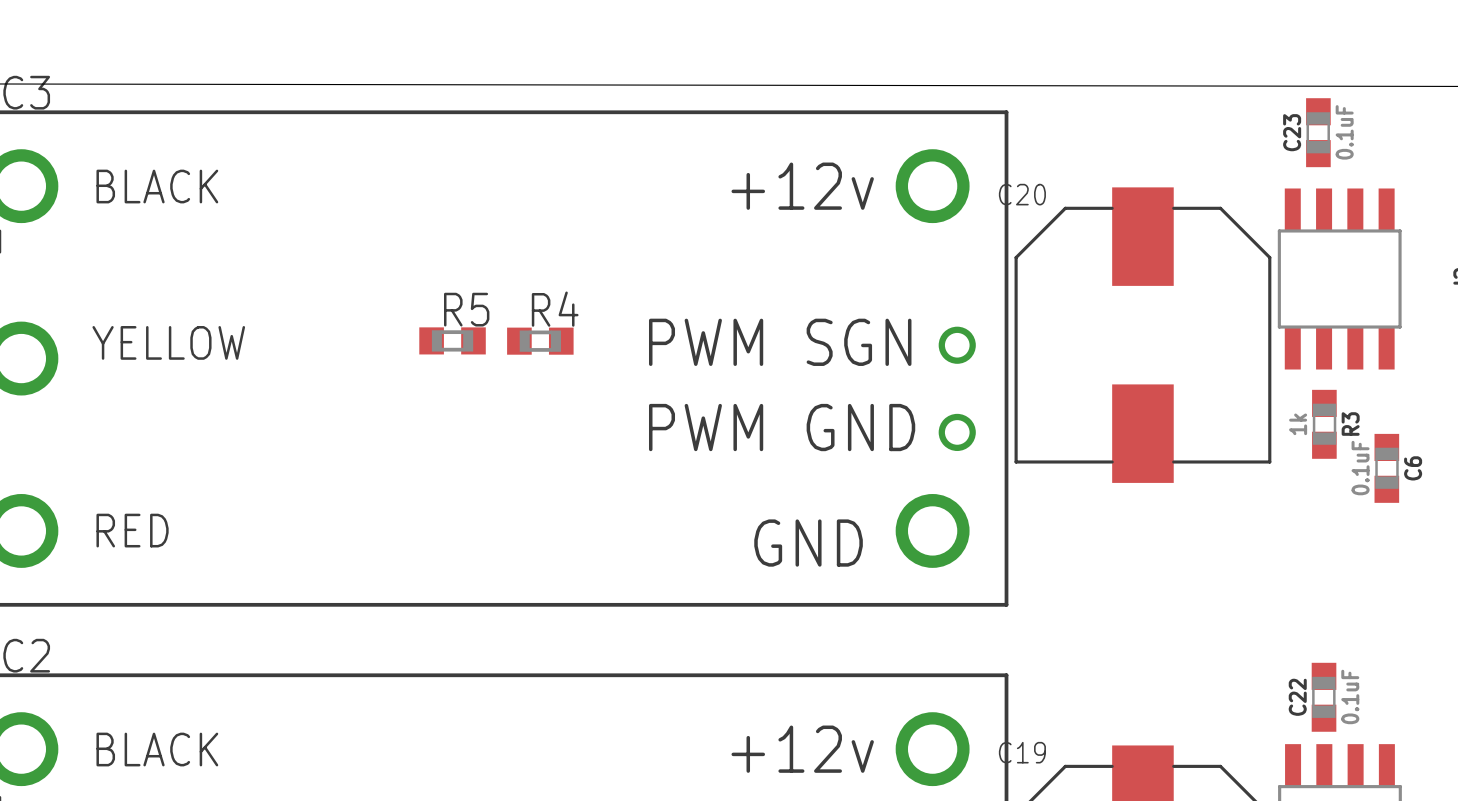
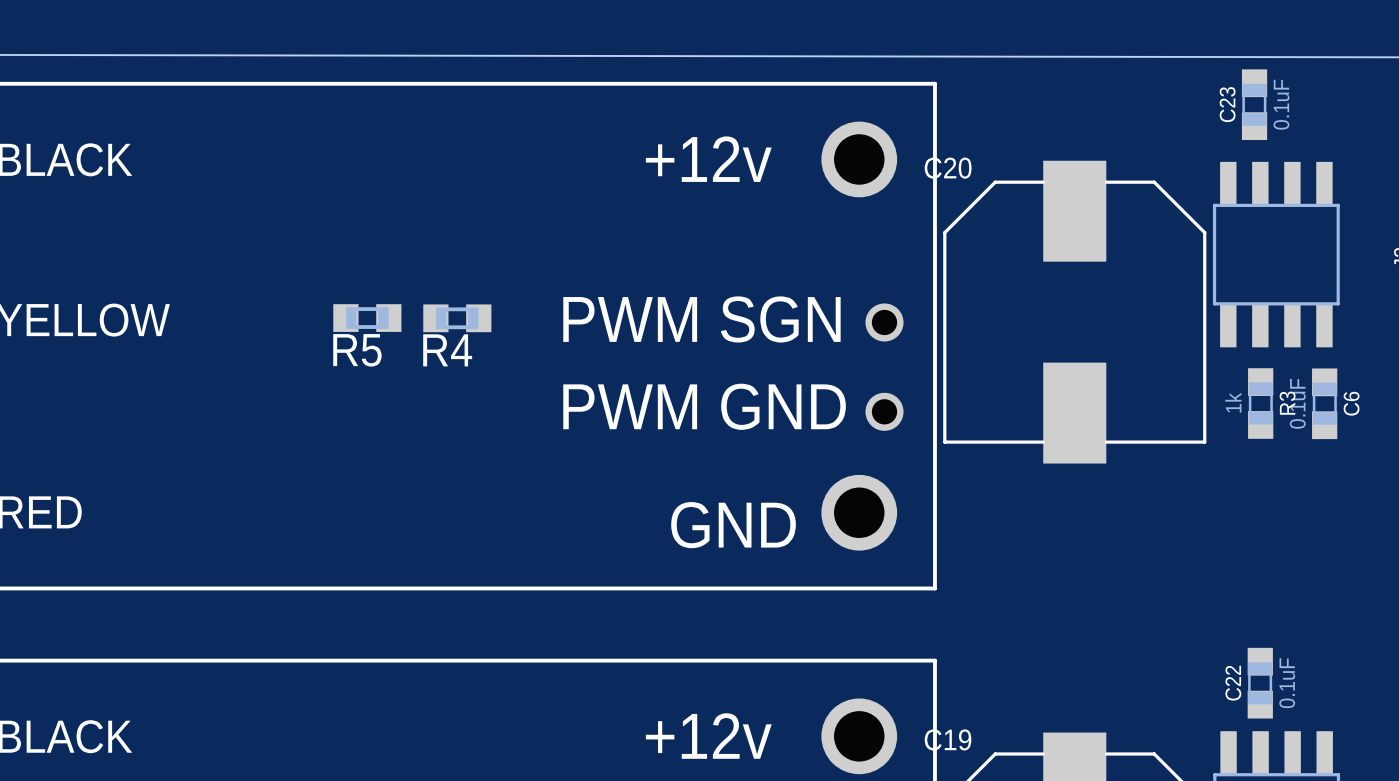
R5 name position: R5 (466, 309) -> R5 (357, 350)
R4 name position: R4 (555, 309) -> R4 (447, 350)
C6 position: (1386, 468) -> (1324, 403)

